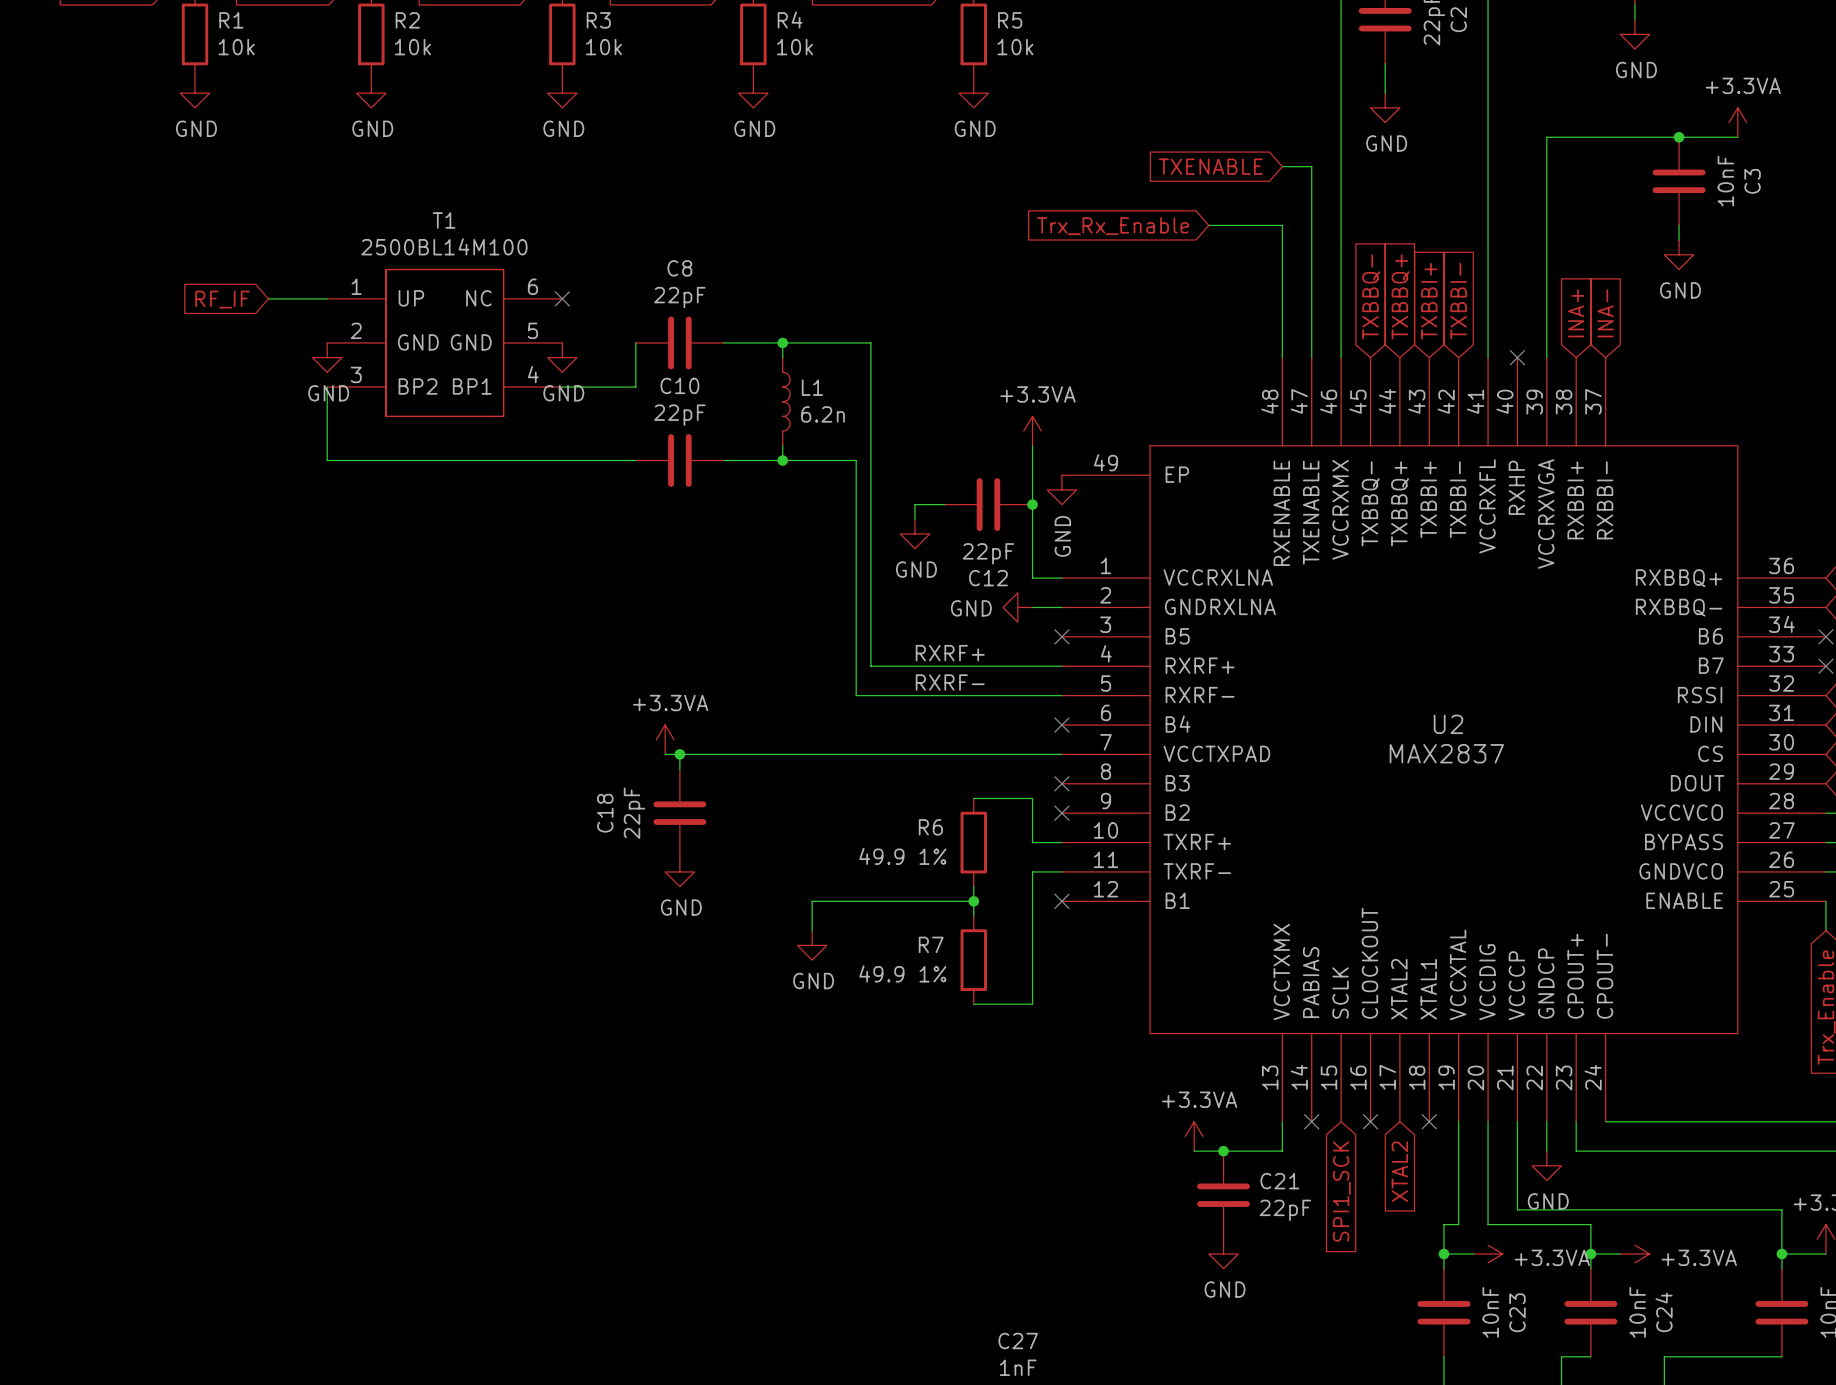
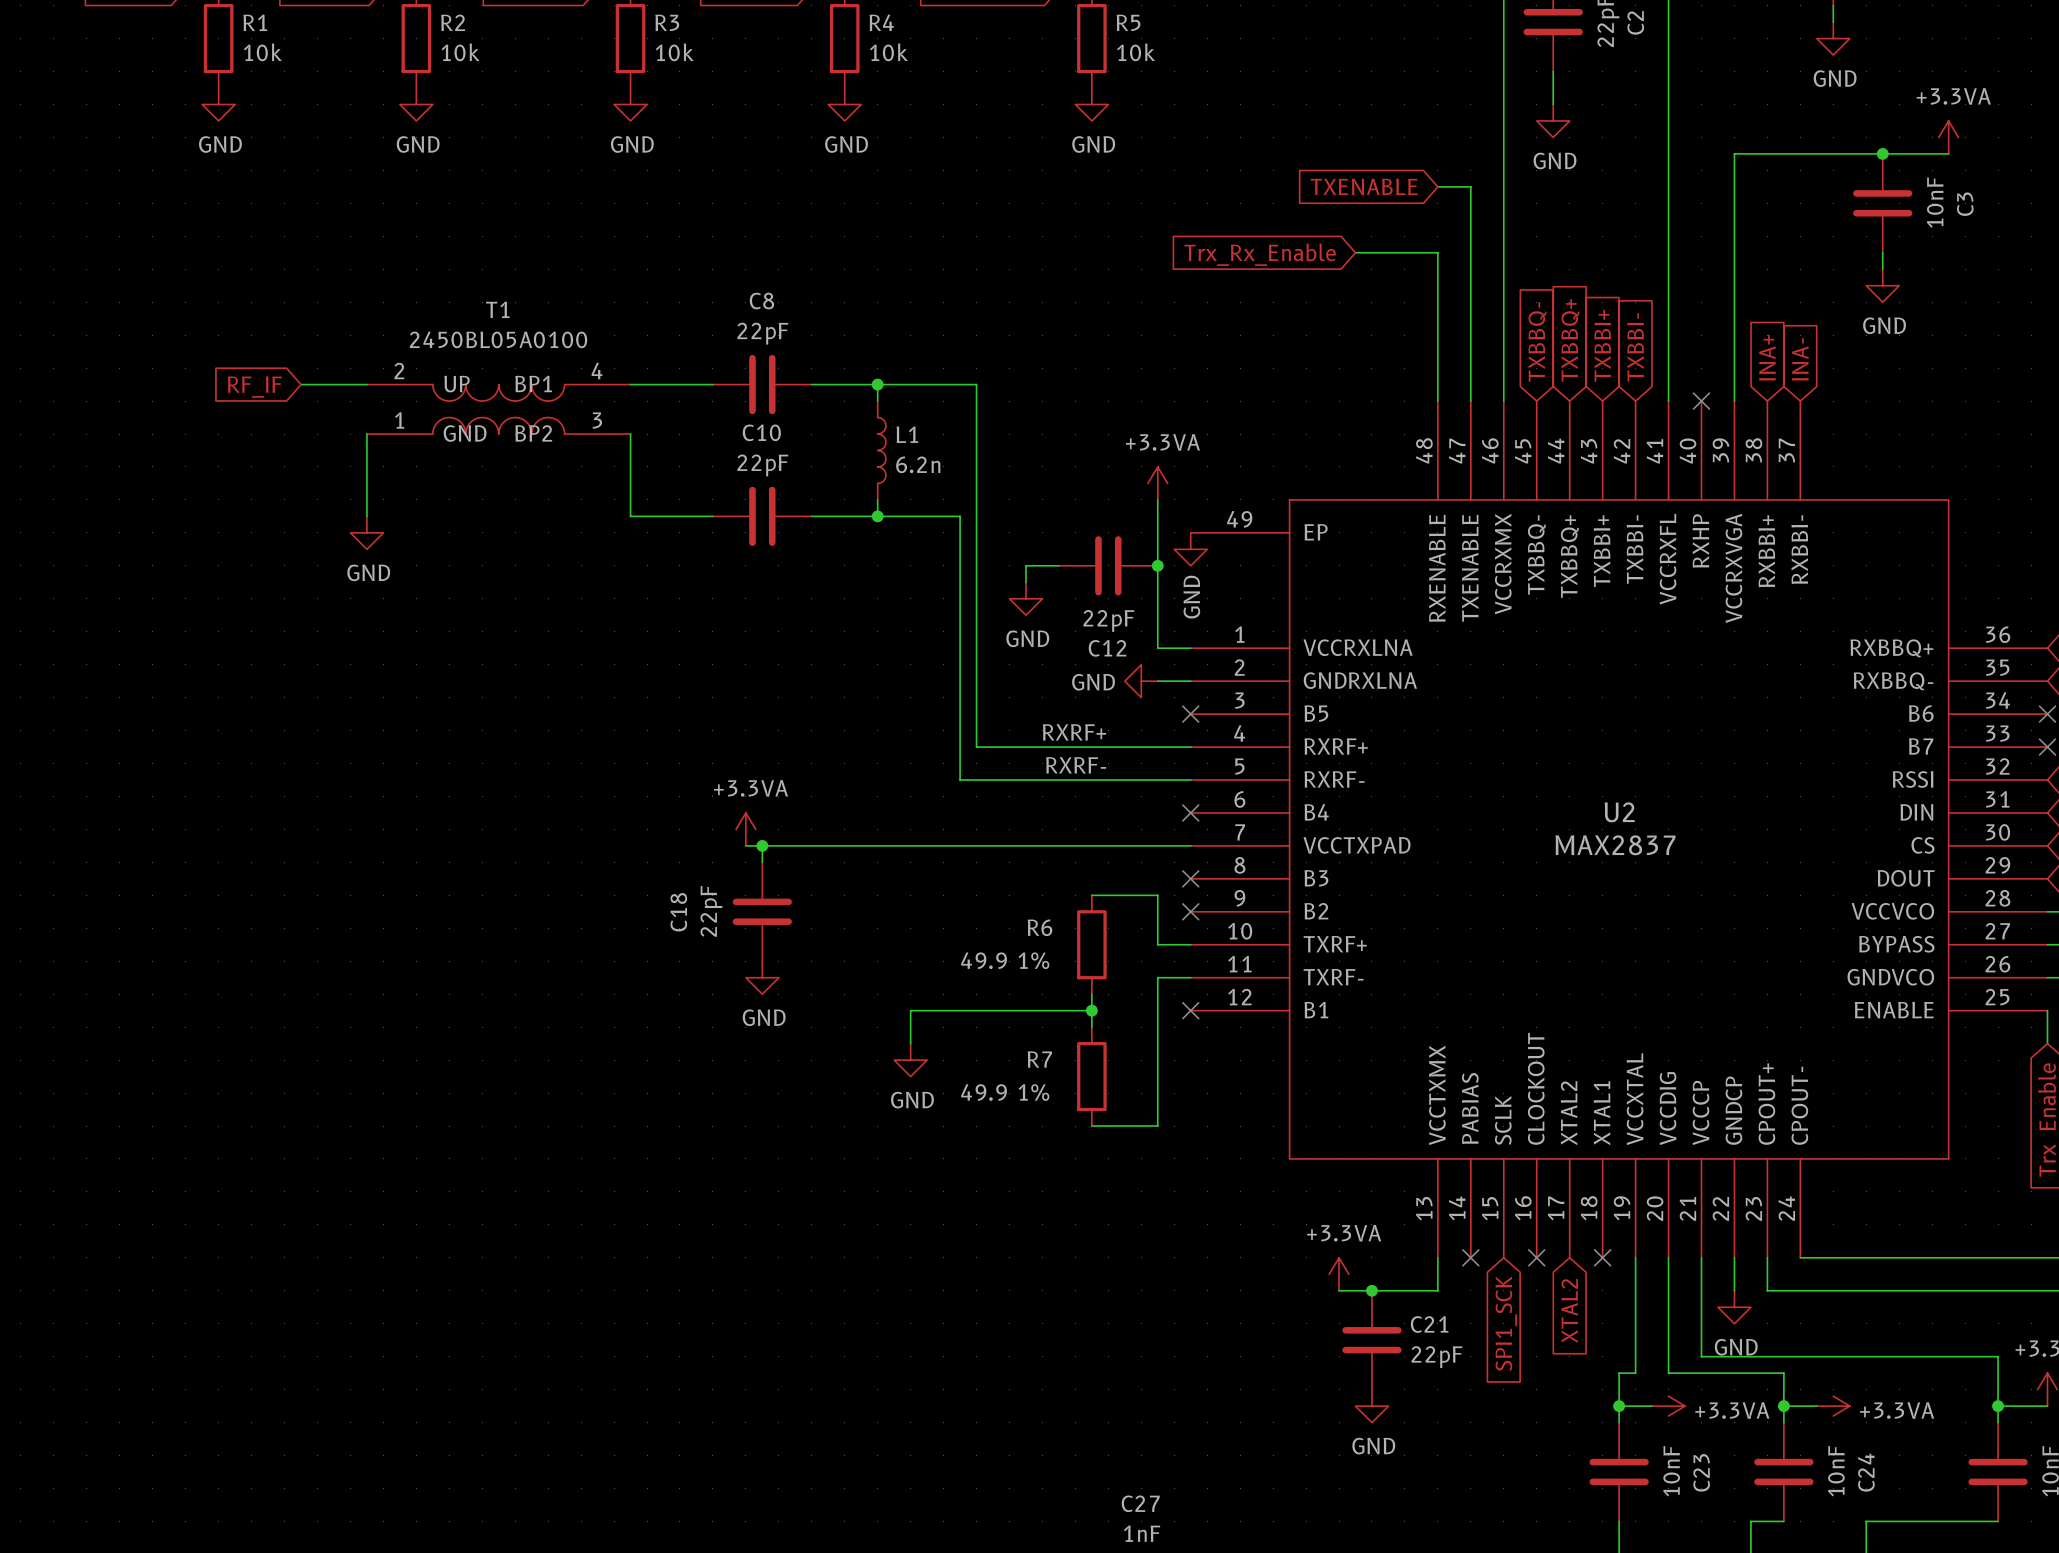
T1 name position: T1 (444, 220) -> T1 (497, 309)
T1 value: 2500BL14M100 (444, 246) -> 2450BL05A0100 (498, 339)
T1 symbol: [327, 269, 563, 417] -> [366, 384, 631, 435]
wire: (268, 298) (327, 298) -> (301, 384) (366, 384)
no-connect mark: (562, 298) -> none
global label position: RF_IF (222, 299) -> RF_IF (254, 387)
wire: (635, 342) (635, 387) (562, 387) -> (712, 384) (630, 384)
power symbol position: GND (327, 357) -> GND (366, 532)
power symbol: GND (562, 357) -> none
wire: (327, 460) (562, 460) -> (630, 434) (630, 516)

